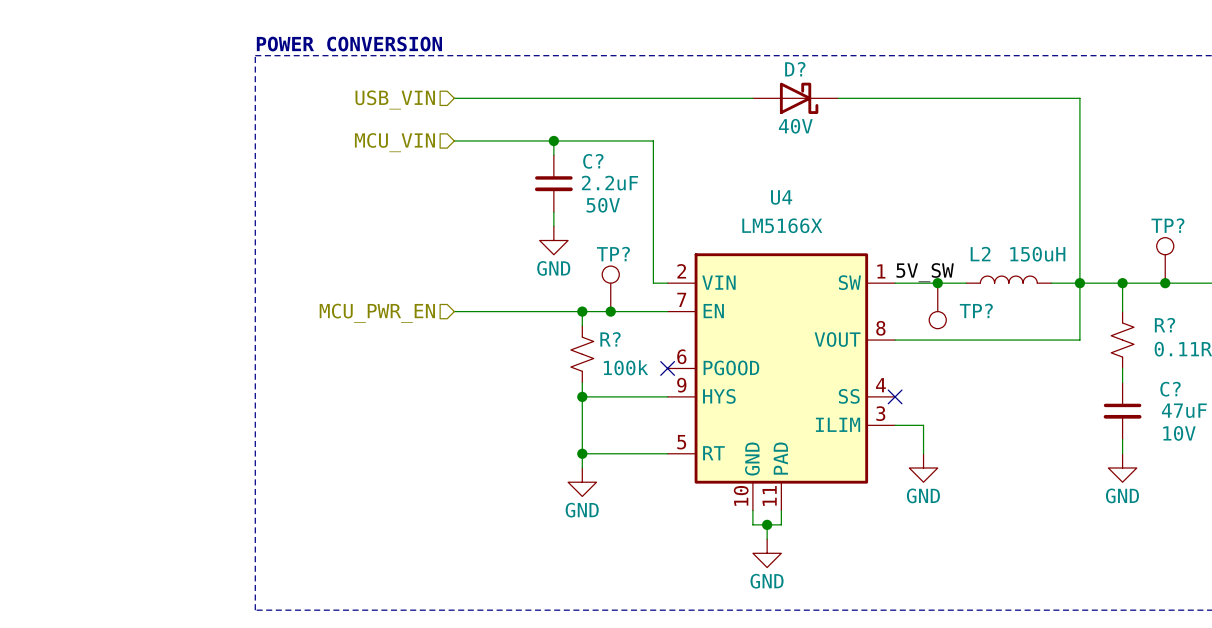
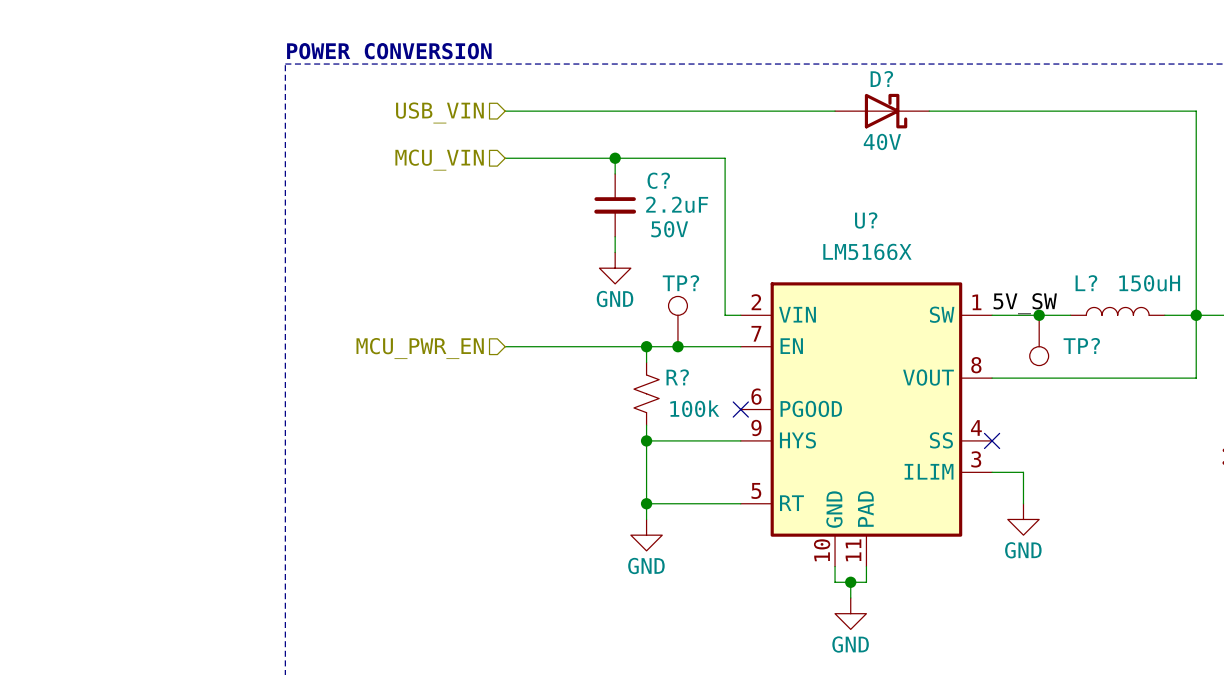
U4 name: U4 (781, 197) -> U? (866, 220)
L2 name: L2 (980, 254) -> L? (1086, 283)

